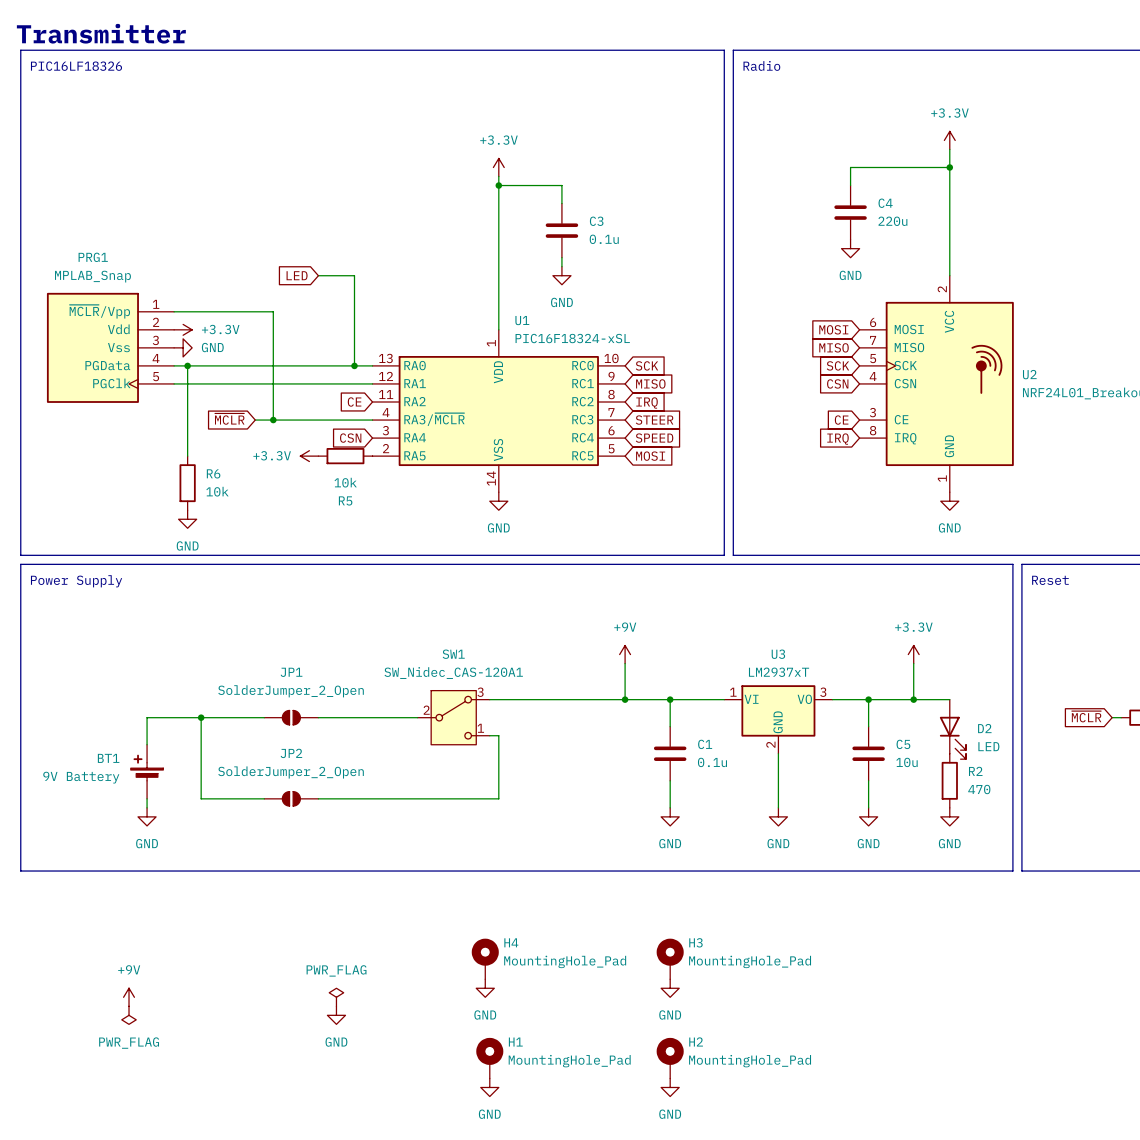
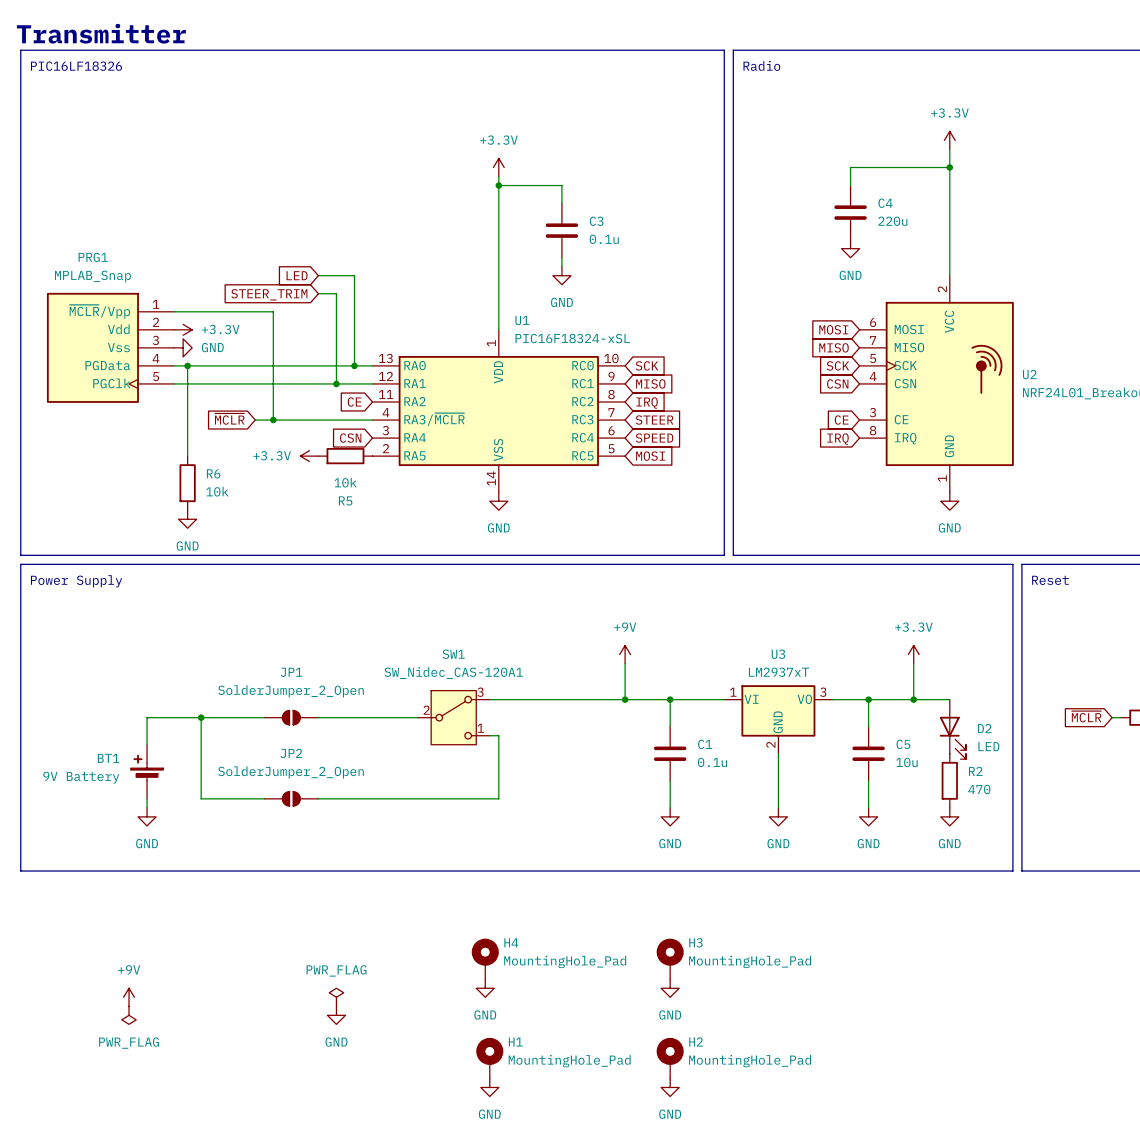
wire: none -> (318, 293) (336, 293) (336, 383)
global label: none -> STEER_TRIM (269, 294)
junction: none -> (336, 383)

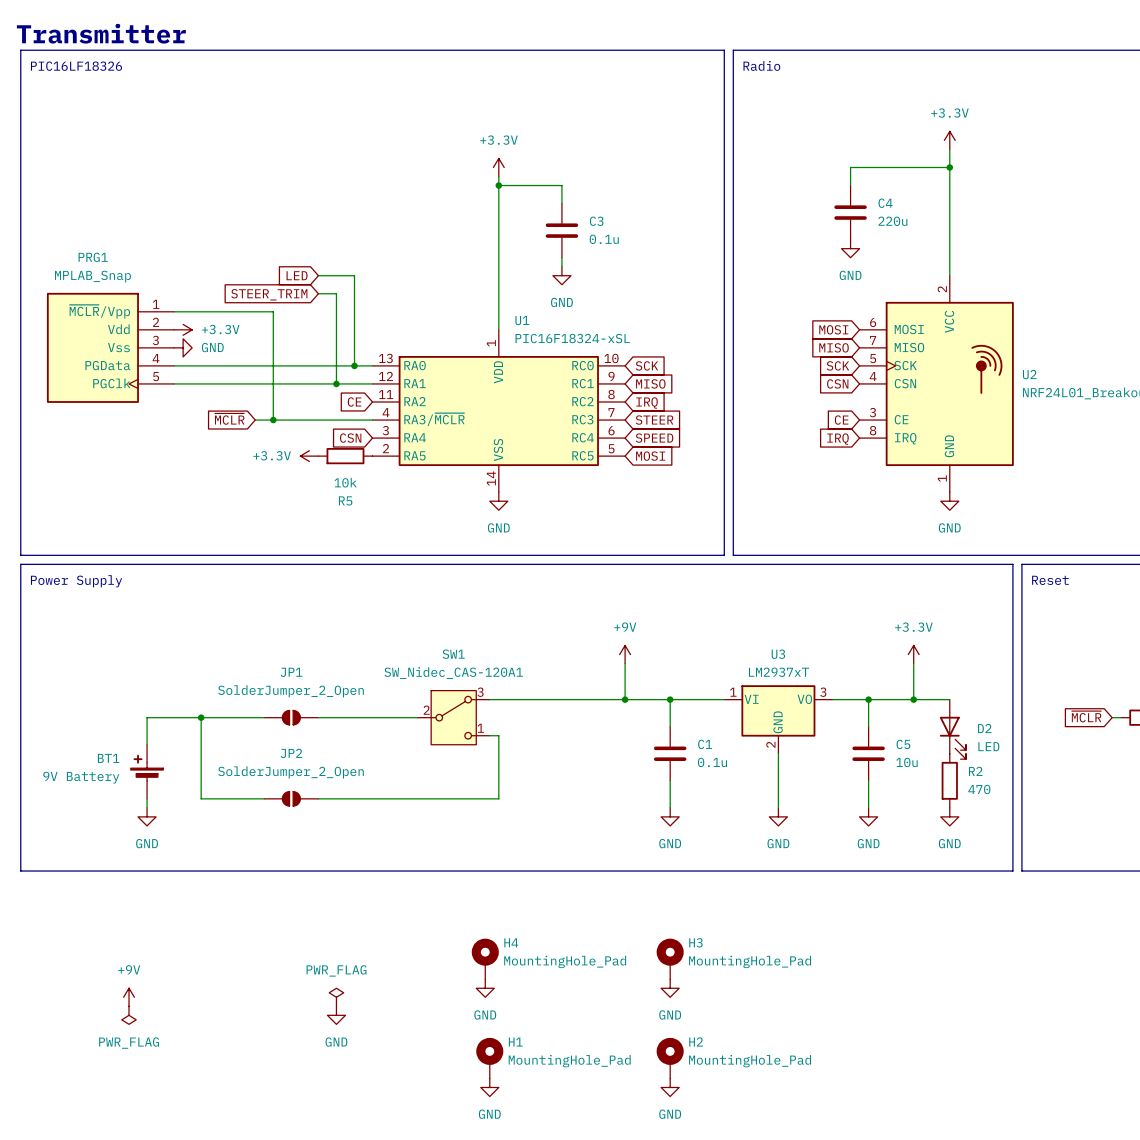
wire: (187, 365) (187, 456) -> none
junction: (187, 365) -> none
R6: 10k (187, 483) -> none
power symbol: GND (187, 519) -> none

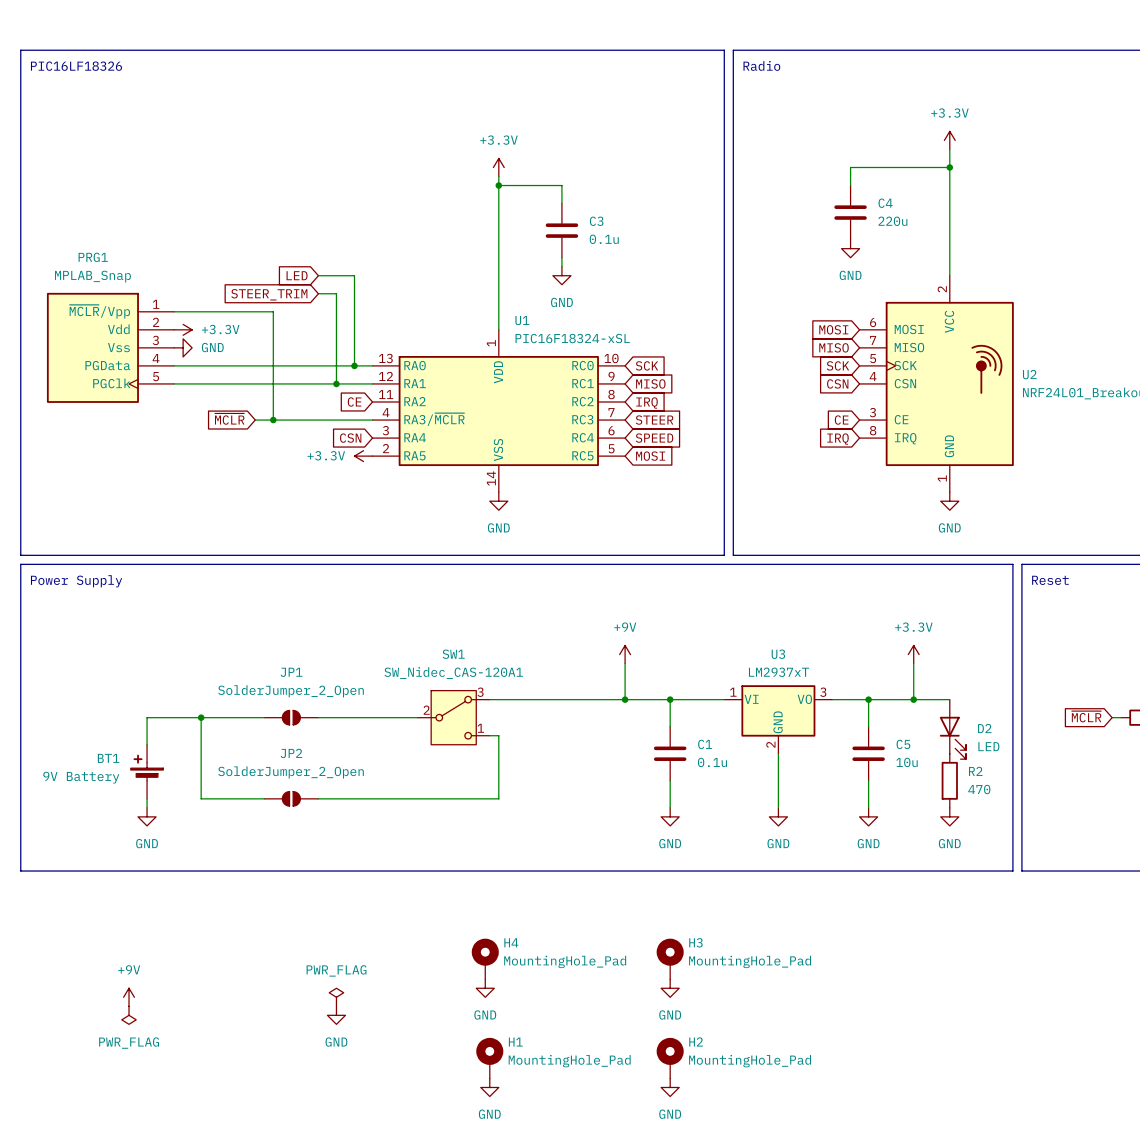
text: Transmitter (101, 33) -> none
power symbol position: +3.3V (309, 456) -> +3.3V (363, 456)
R5: 10k (345, 456) -> none

